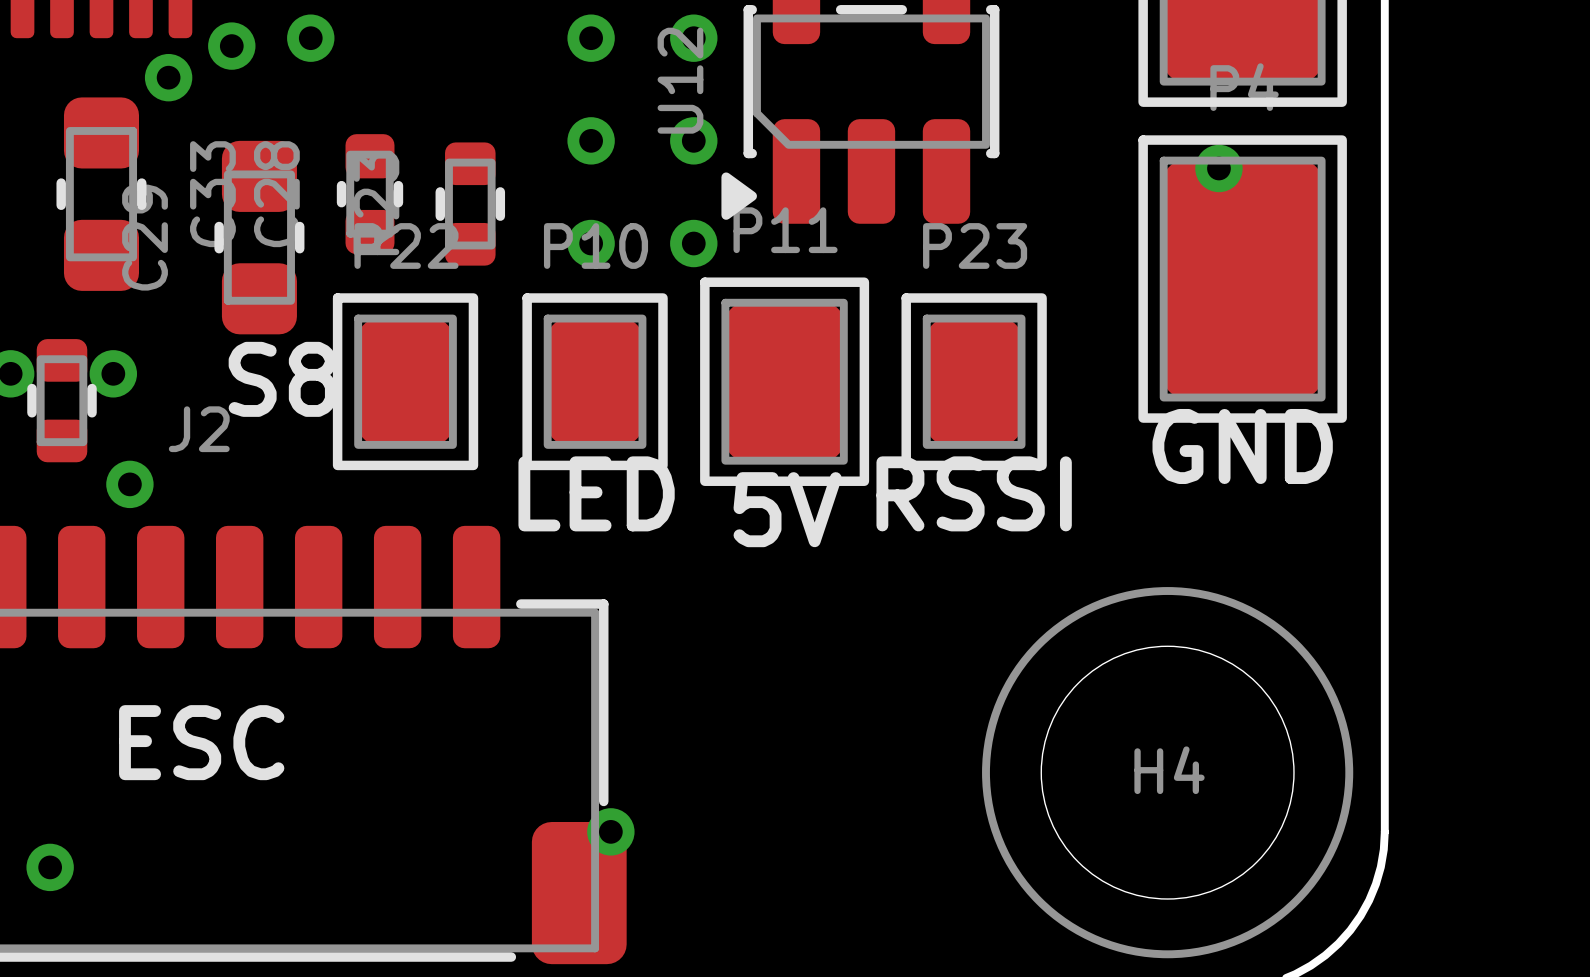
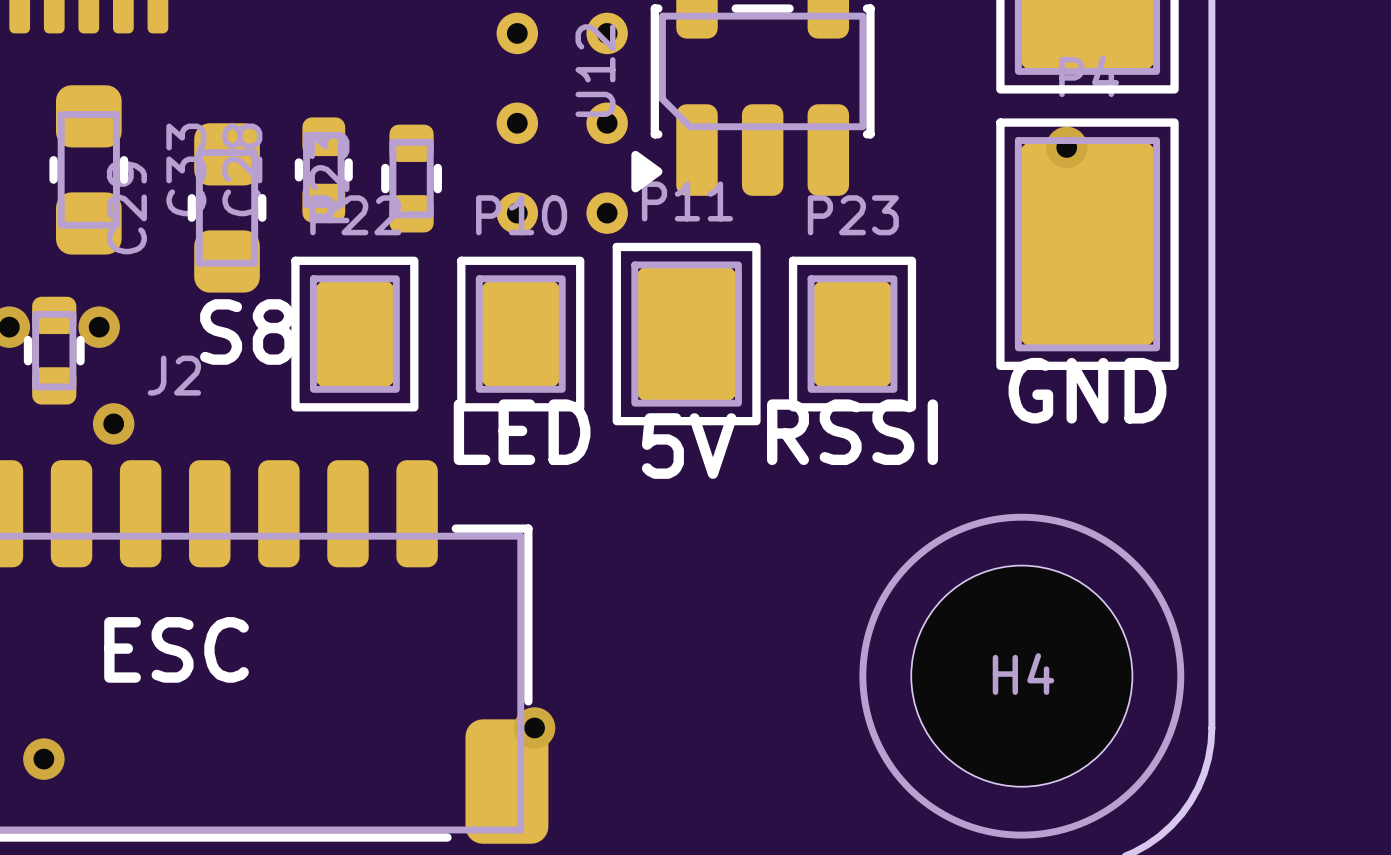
via: (310, 38) -> none
via: (231, 46) -> none
via: (168, 77) -> none

